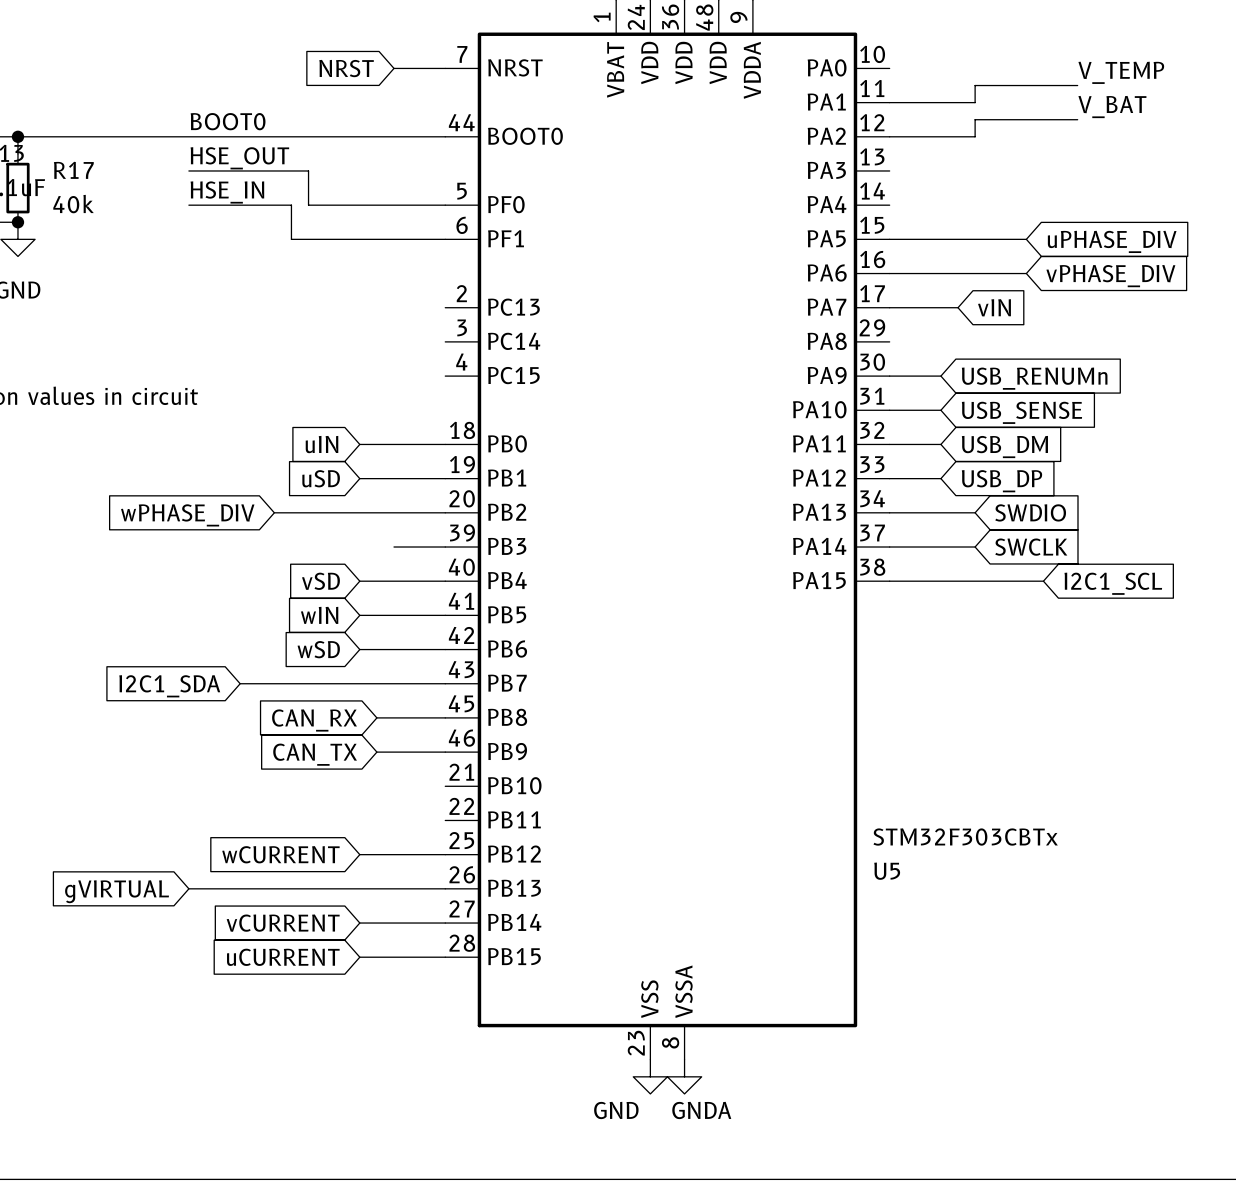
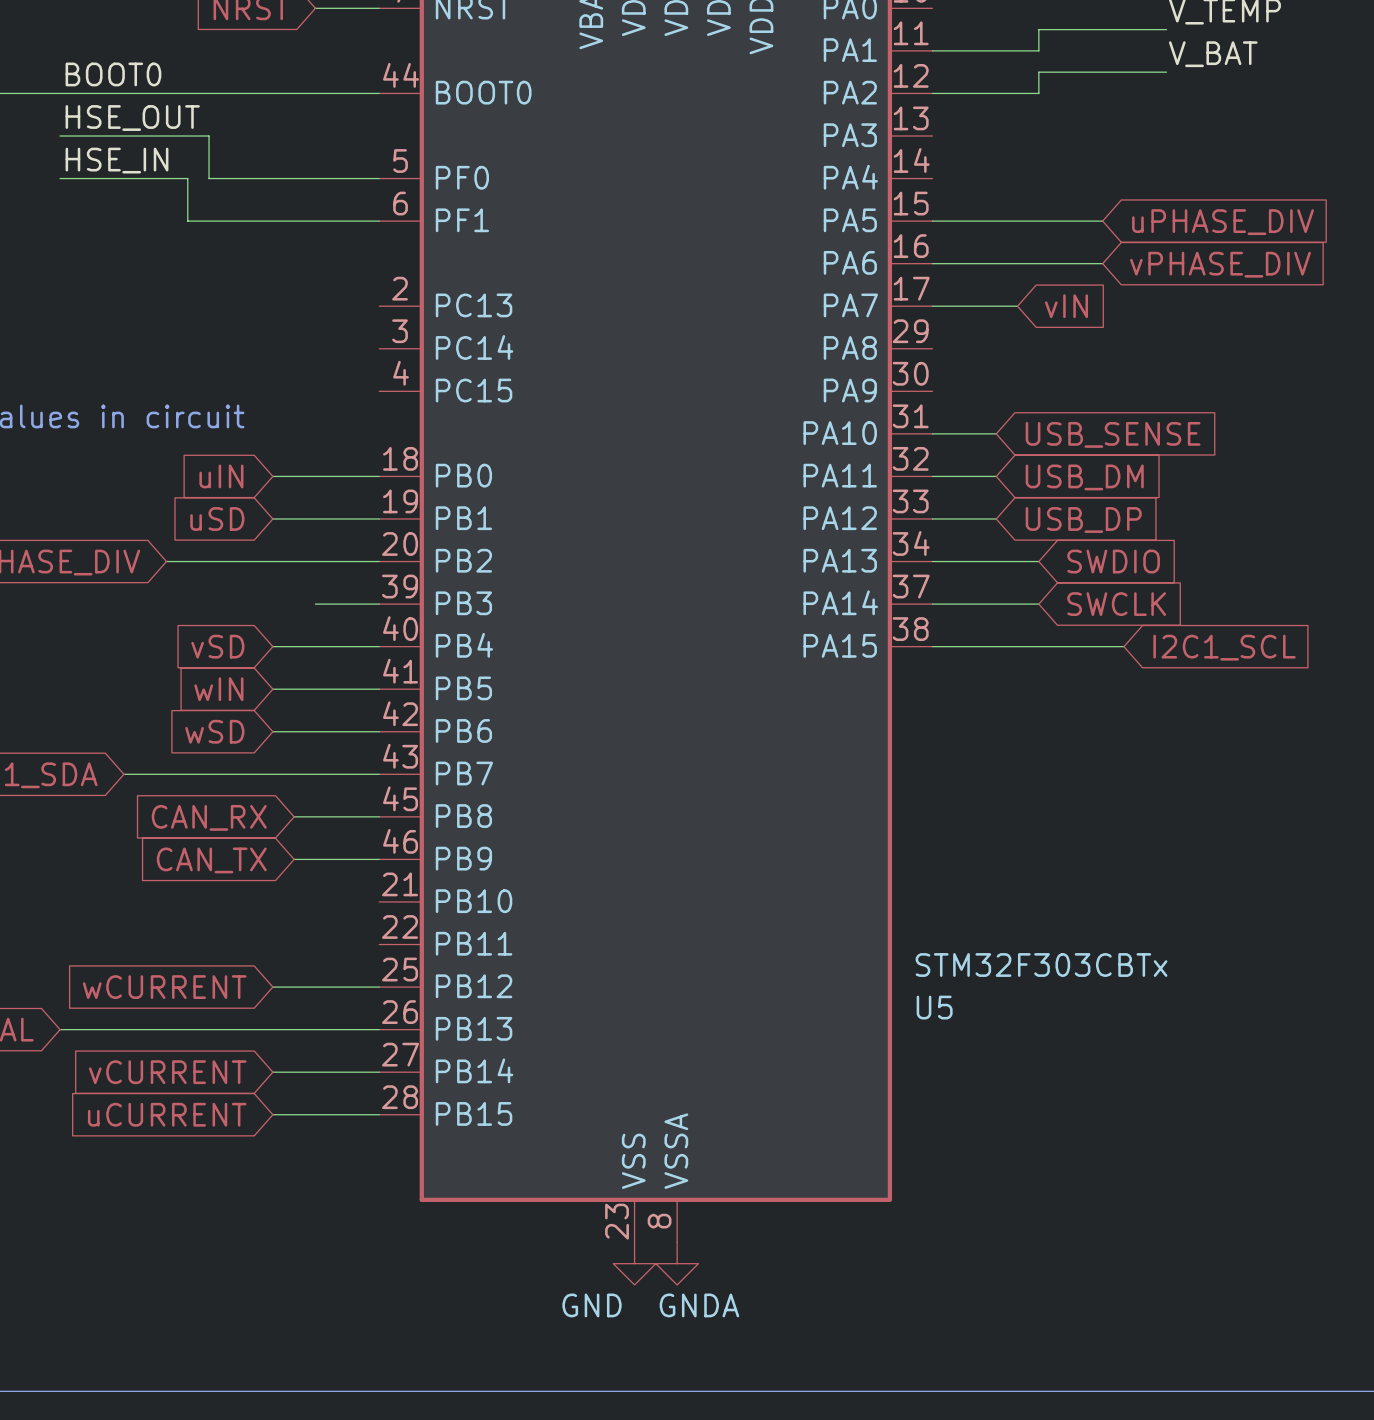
wire: (889, 376) (940, 376) -> none
global label: USB_RENUMn (1034, 378) -> none

